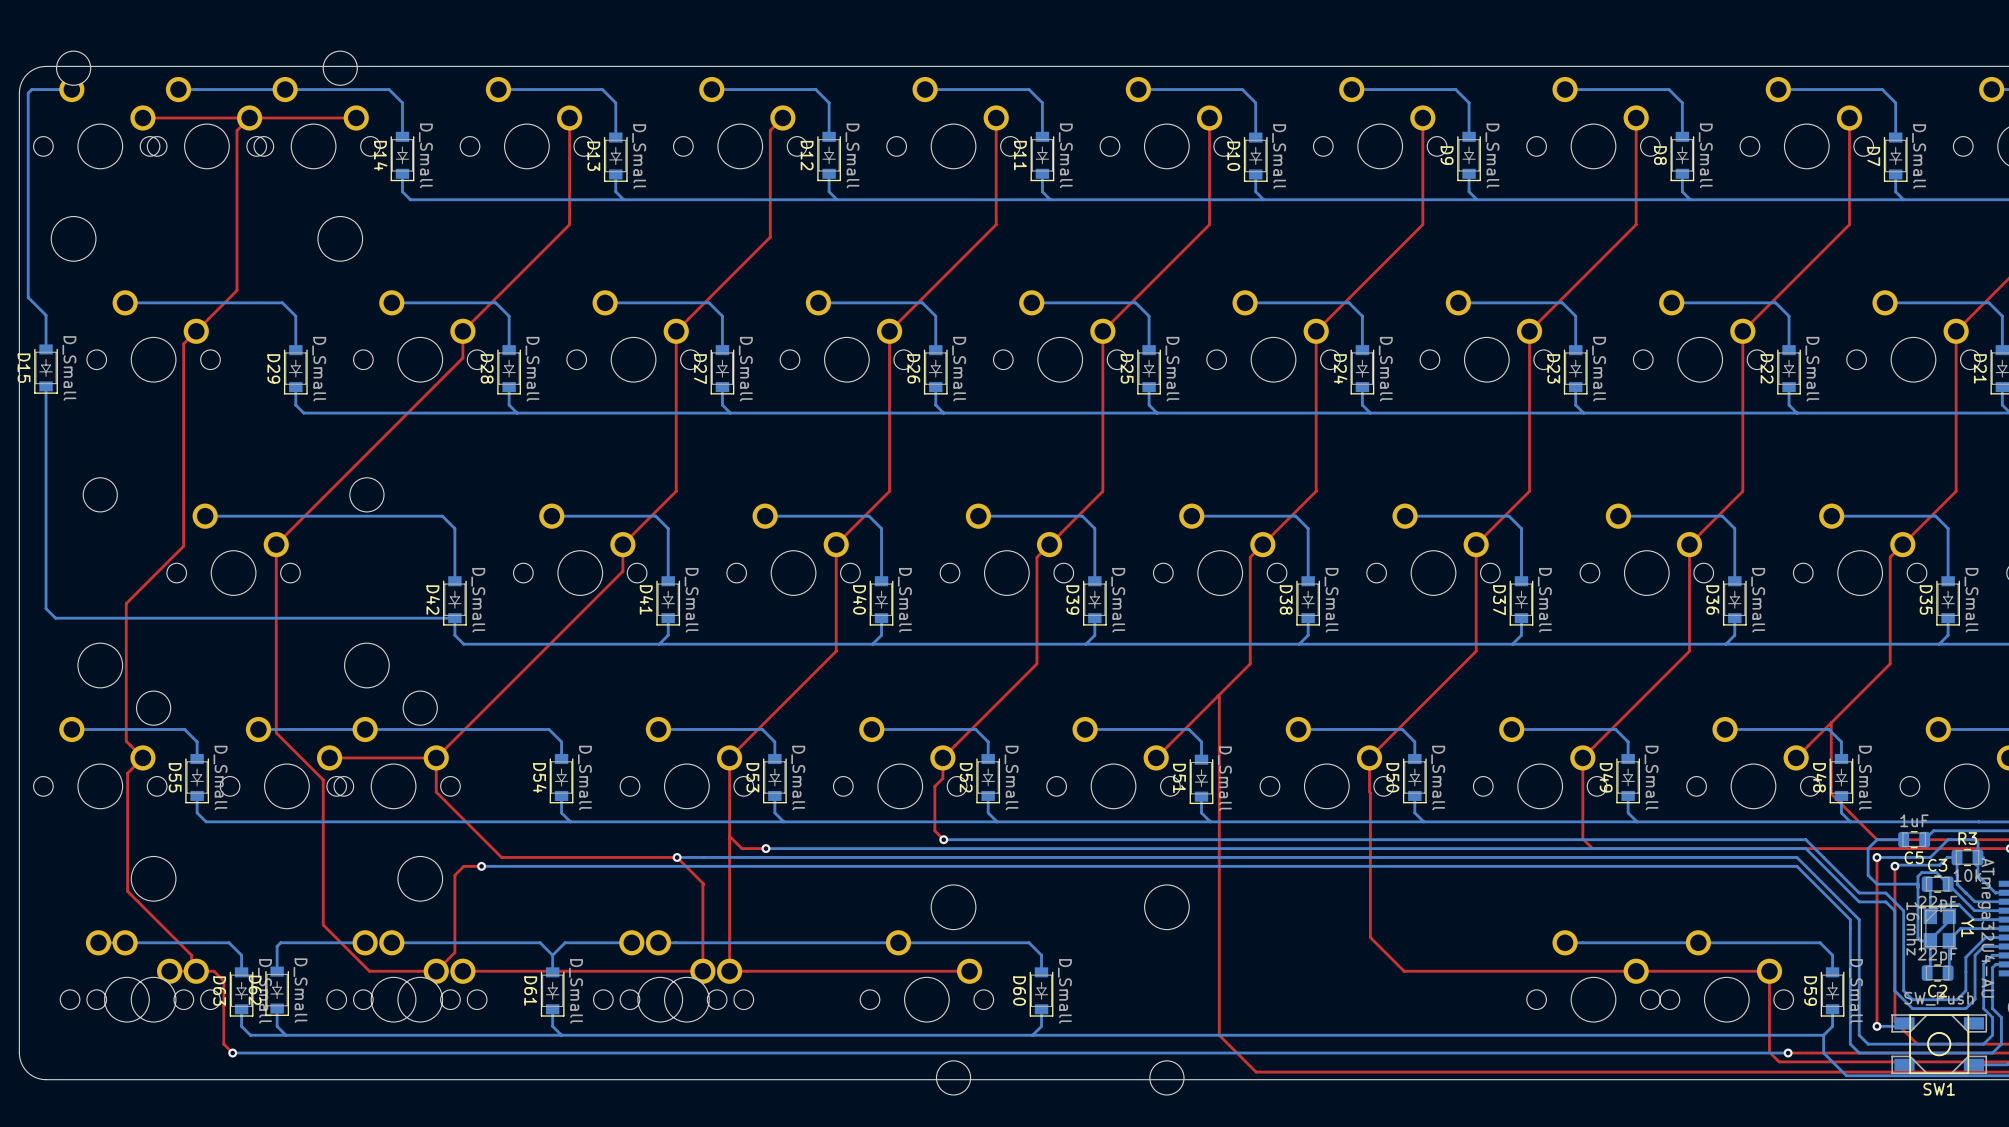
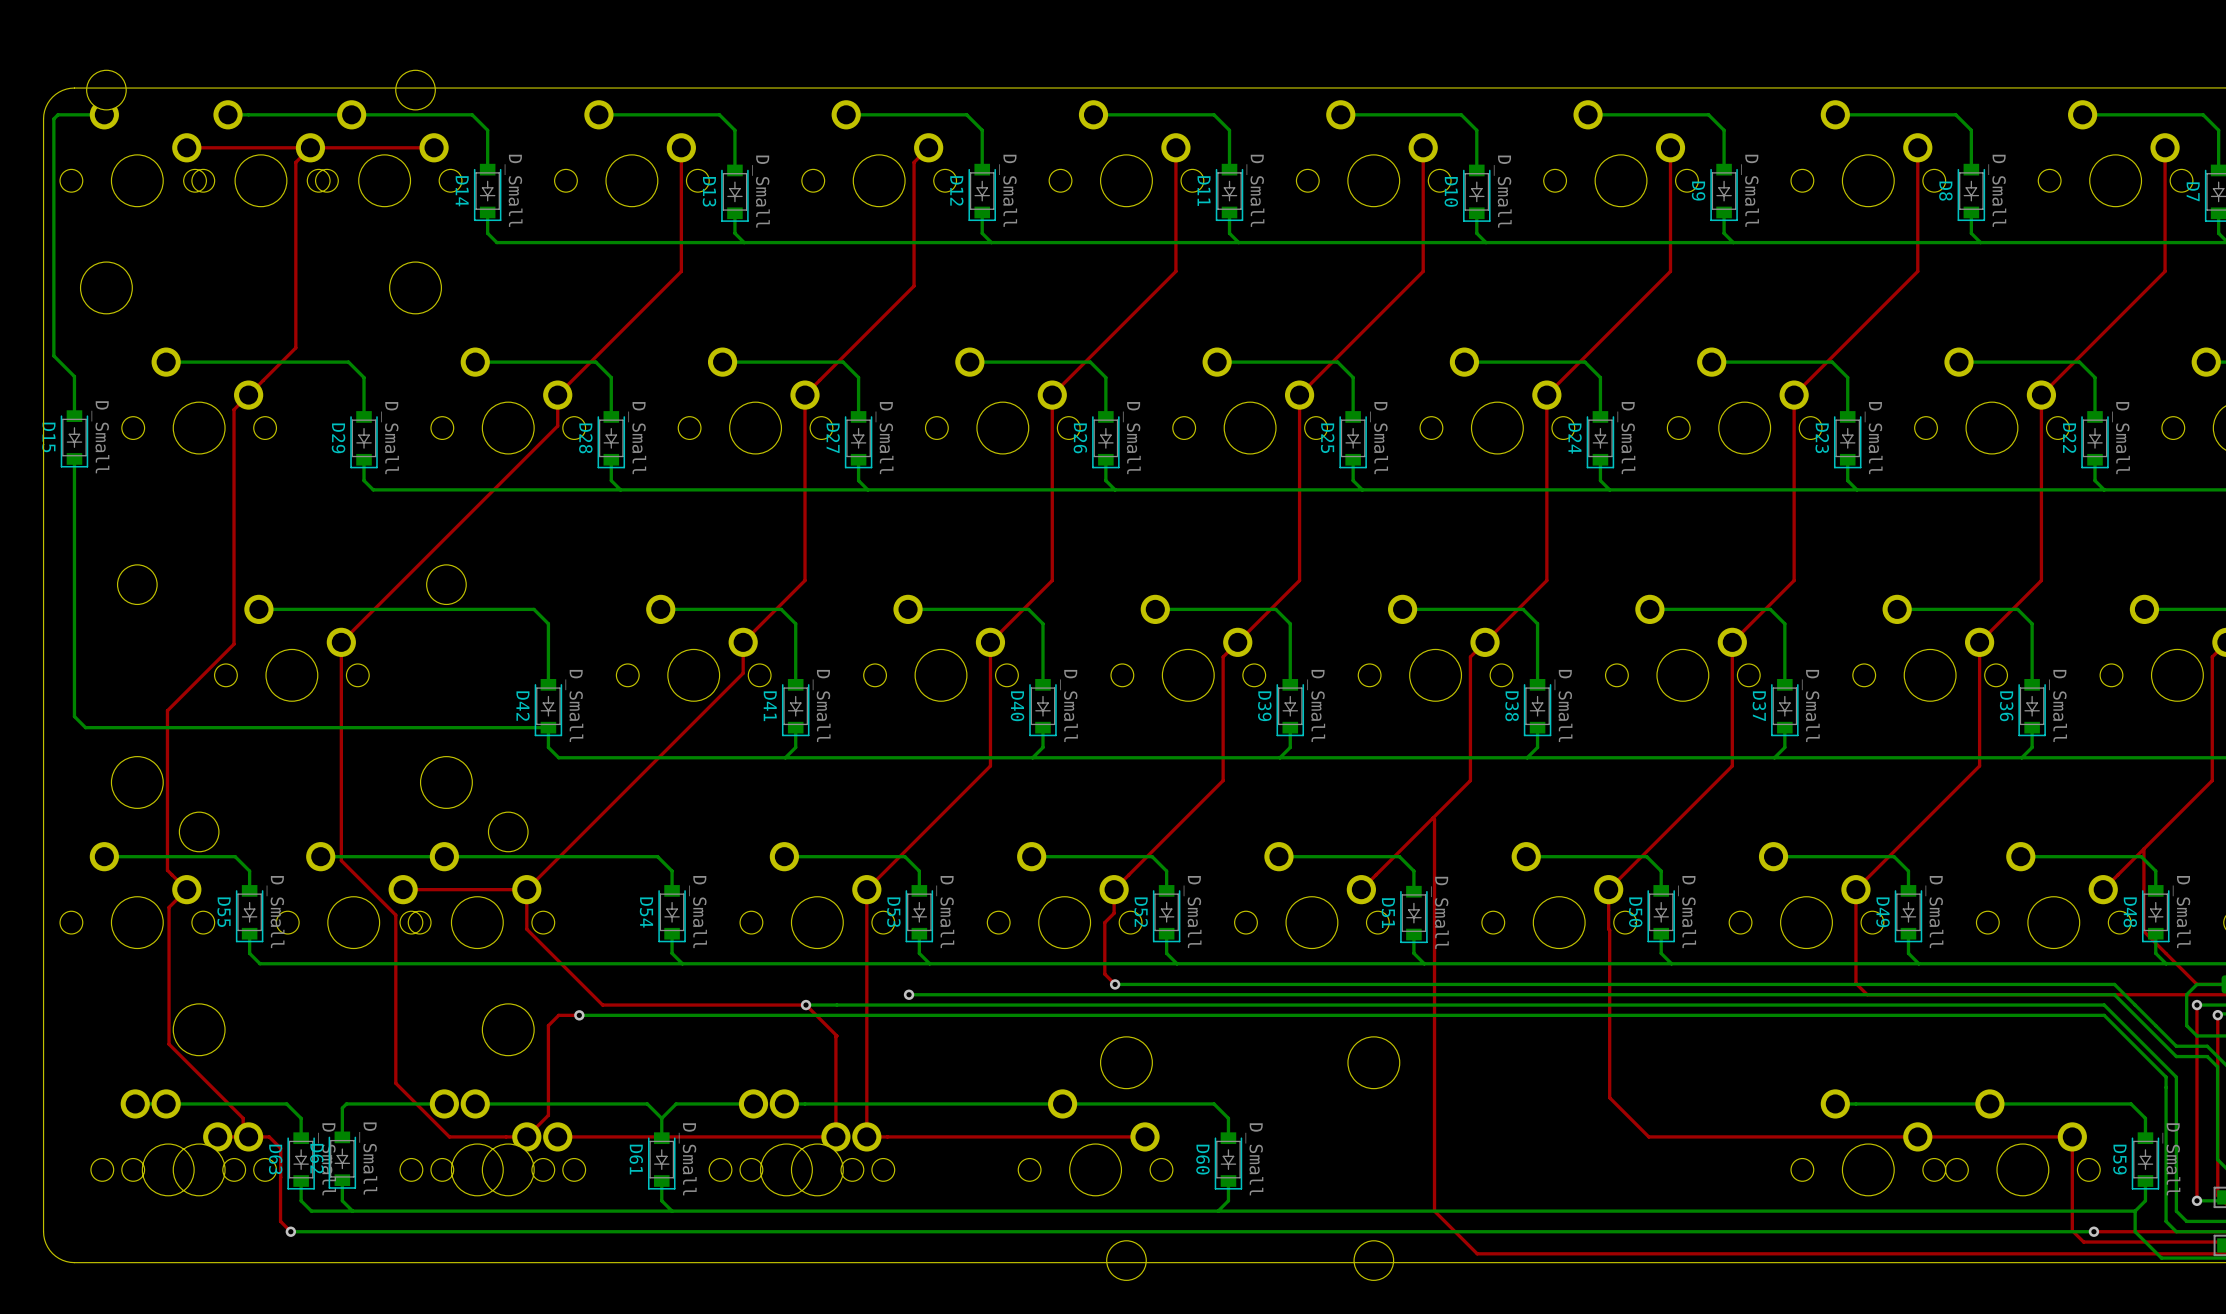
top track: (729, 836) (741, 848) (765, 848) -> none

